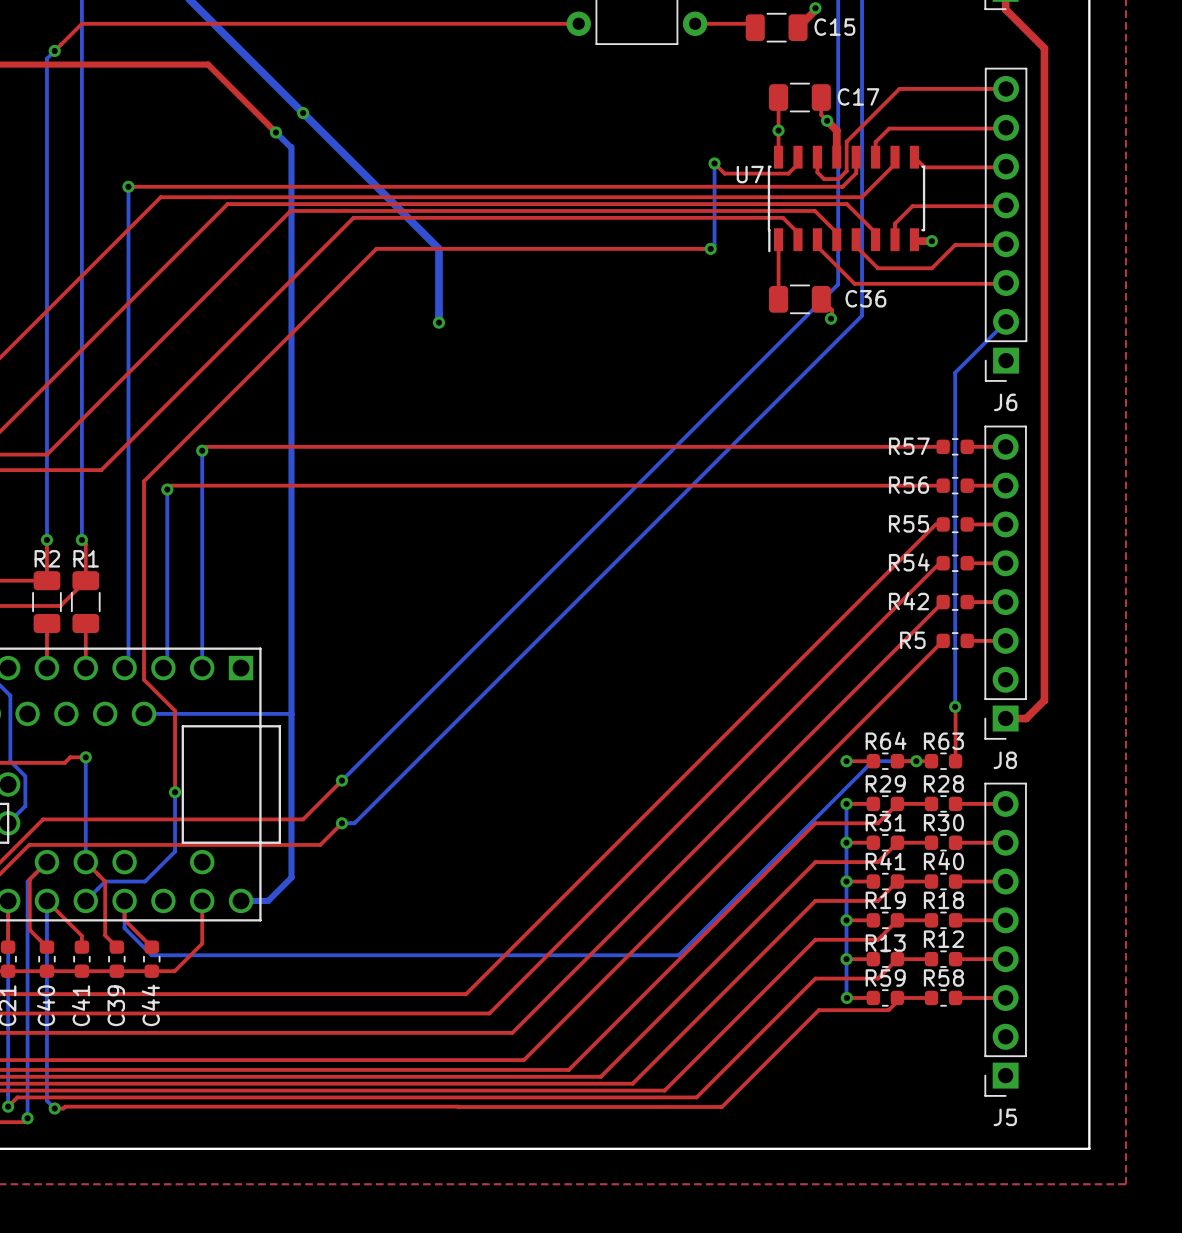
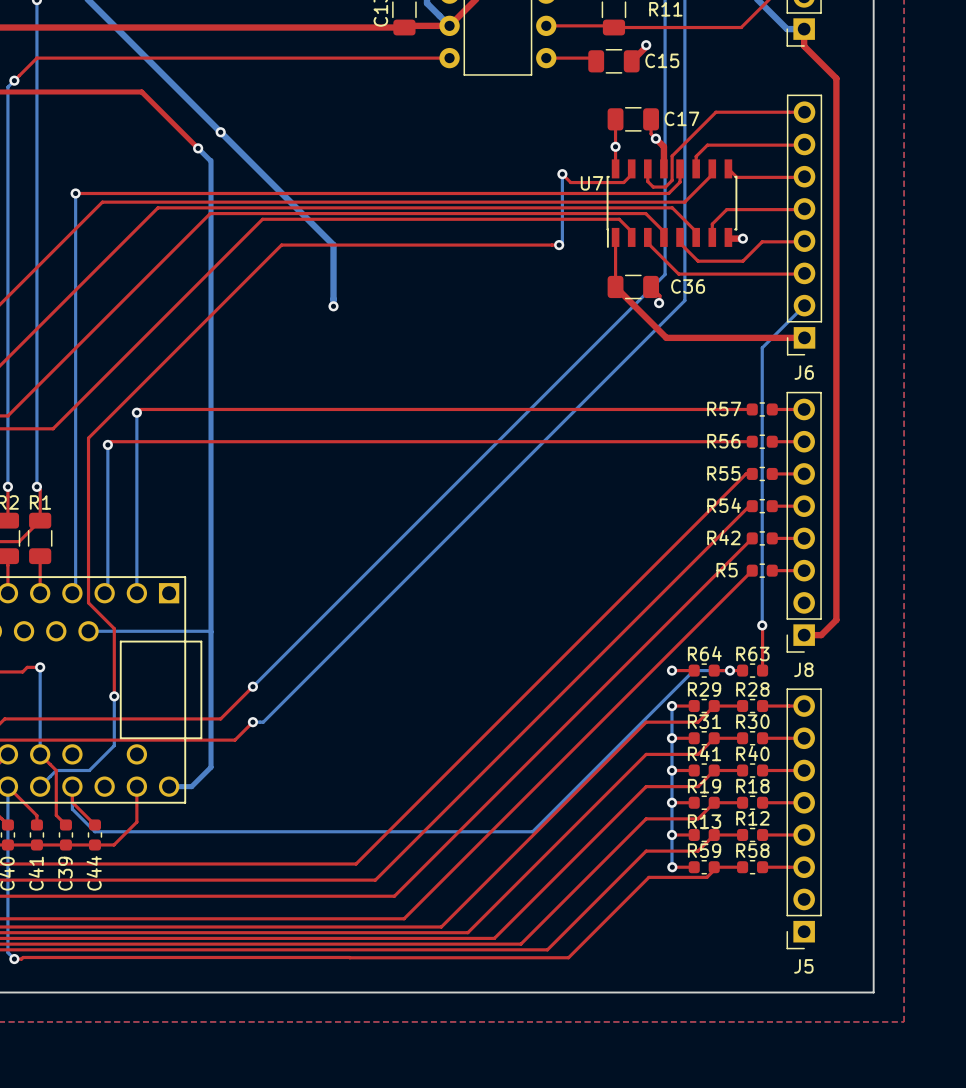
top track: none -> (615, 286) (666, 337) (804, 337)

